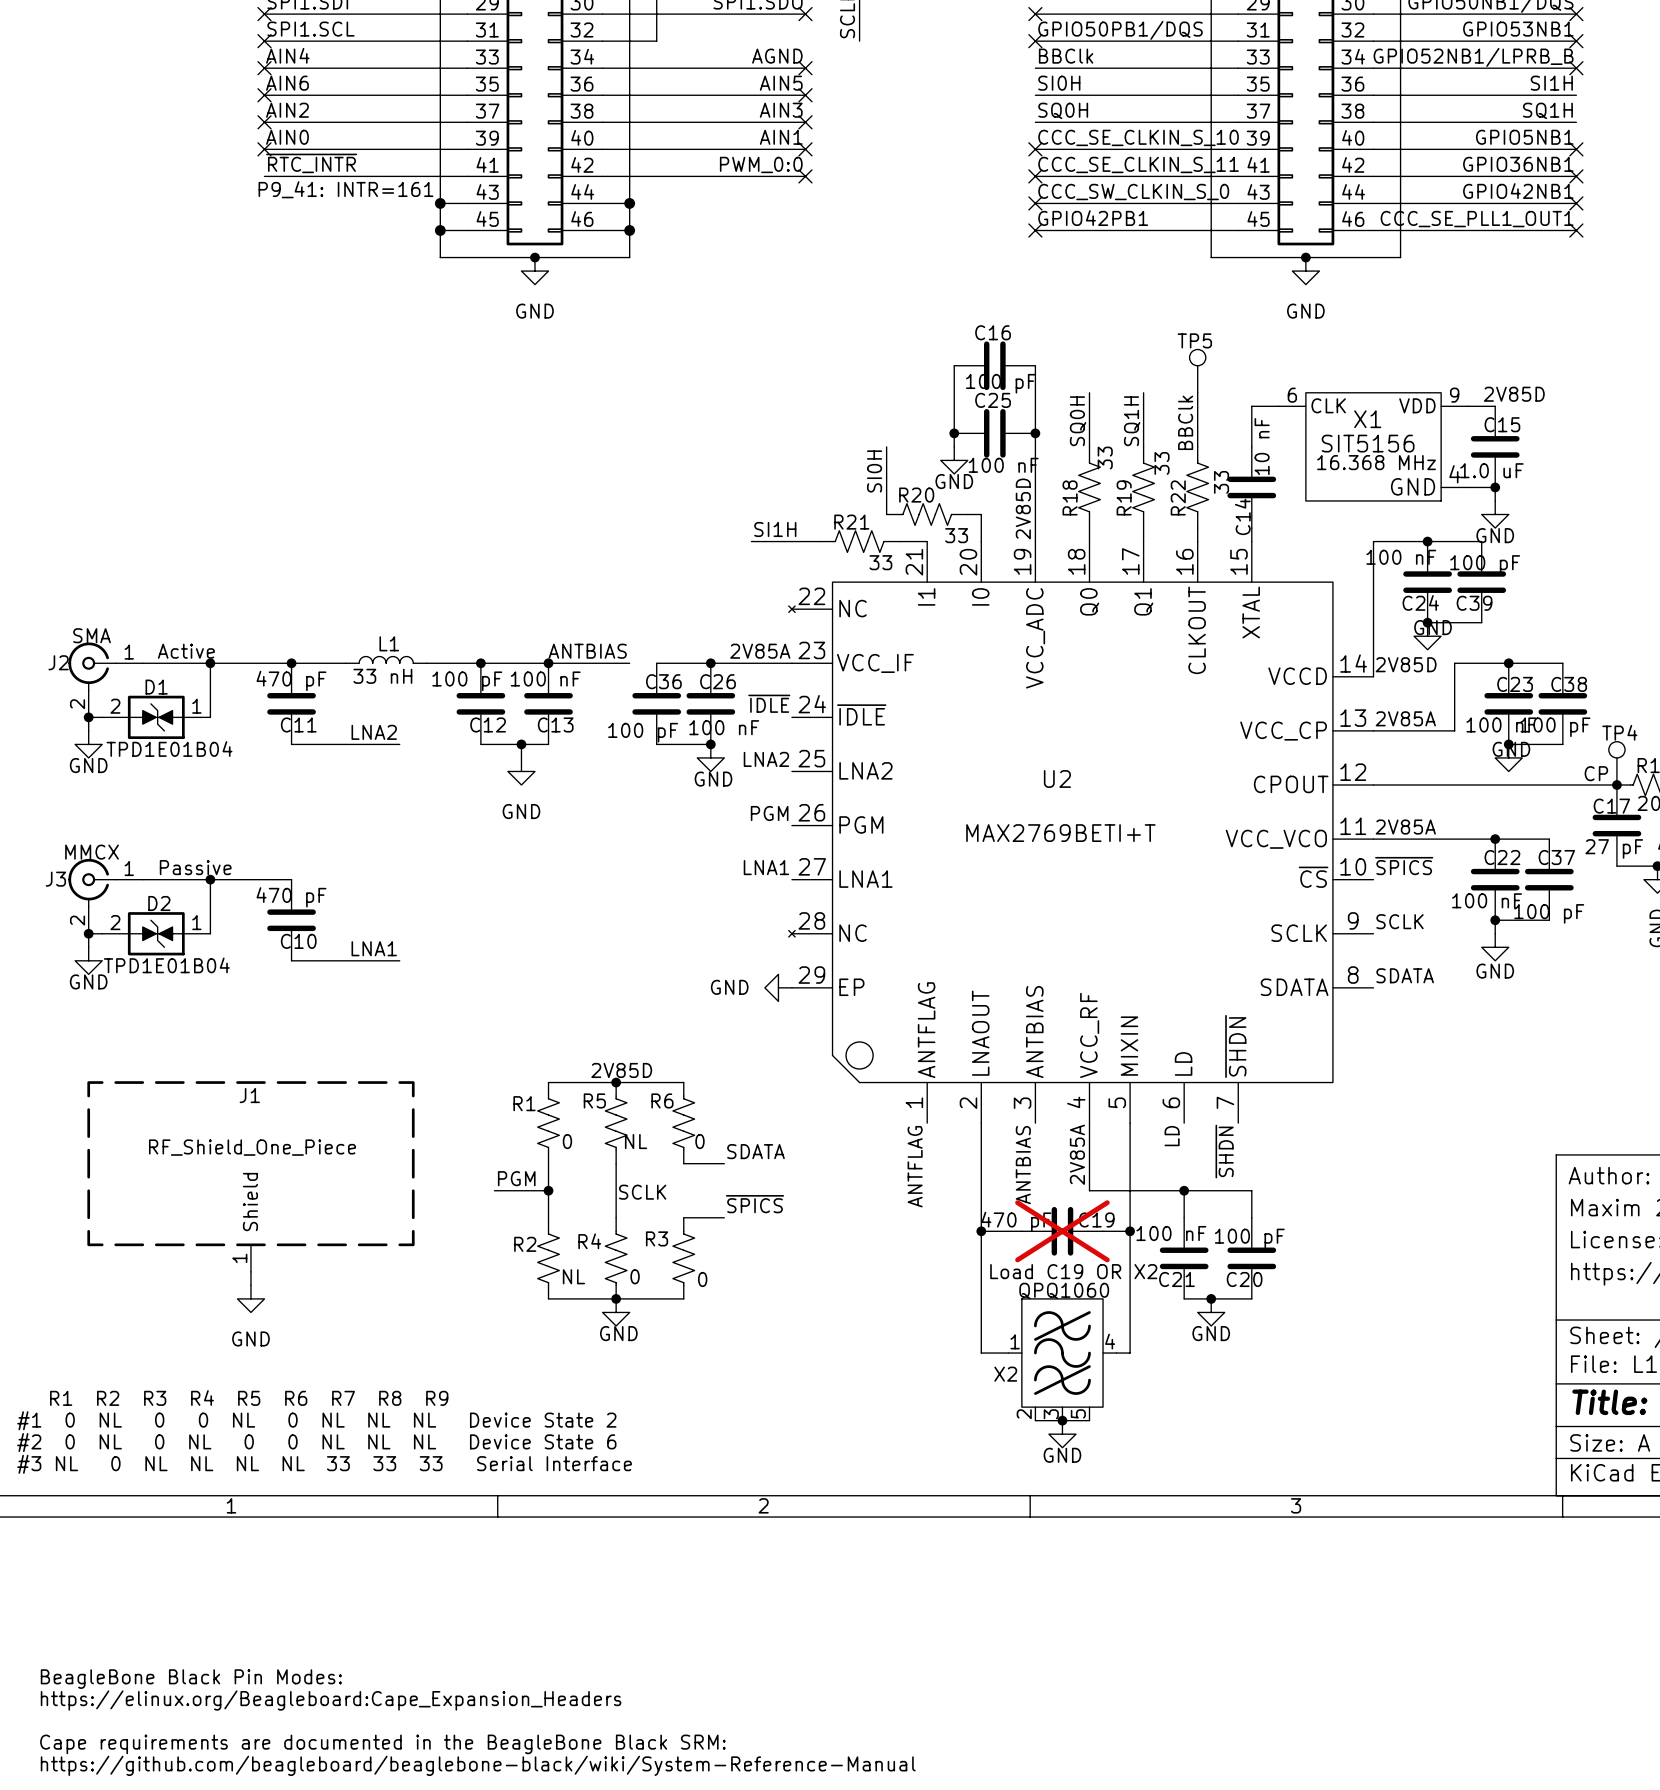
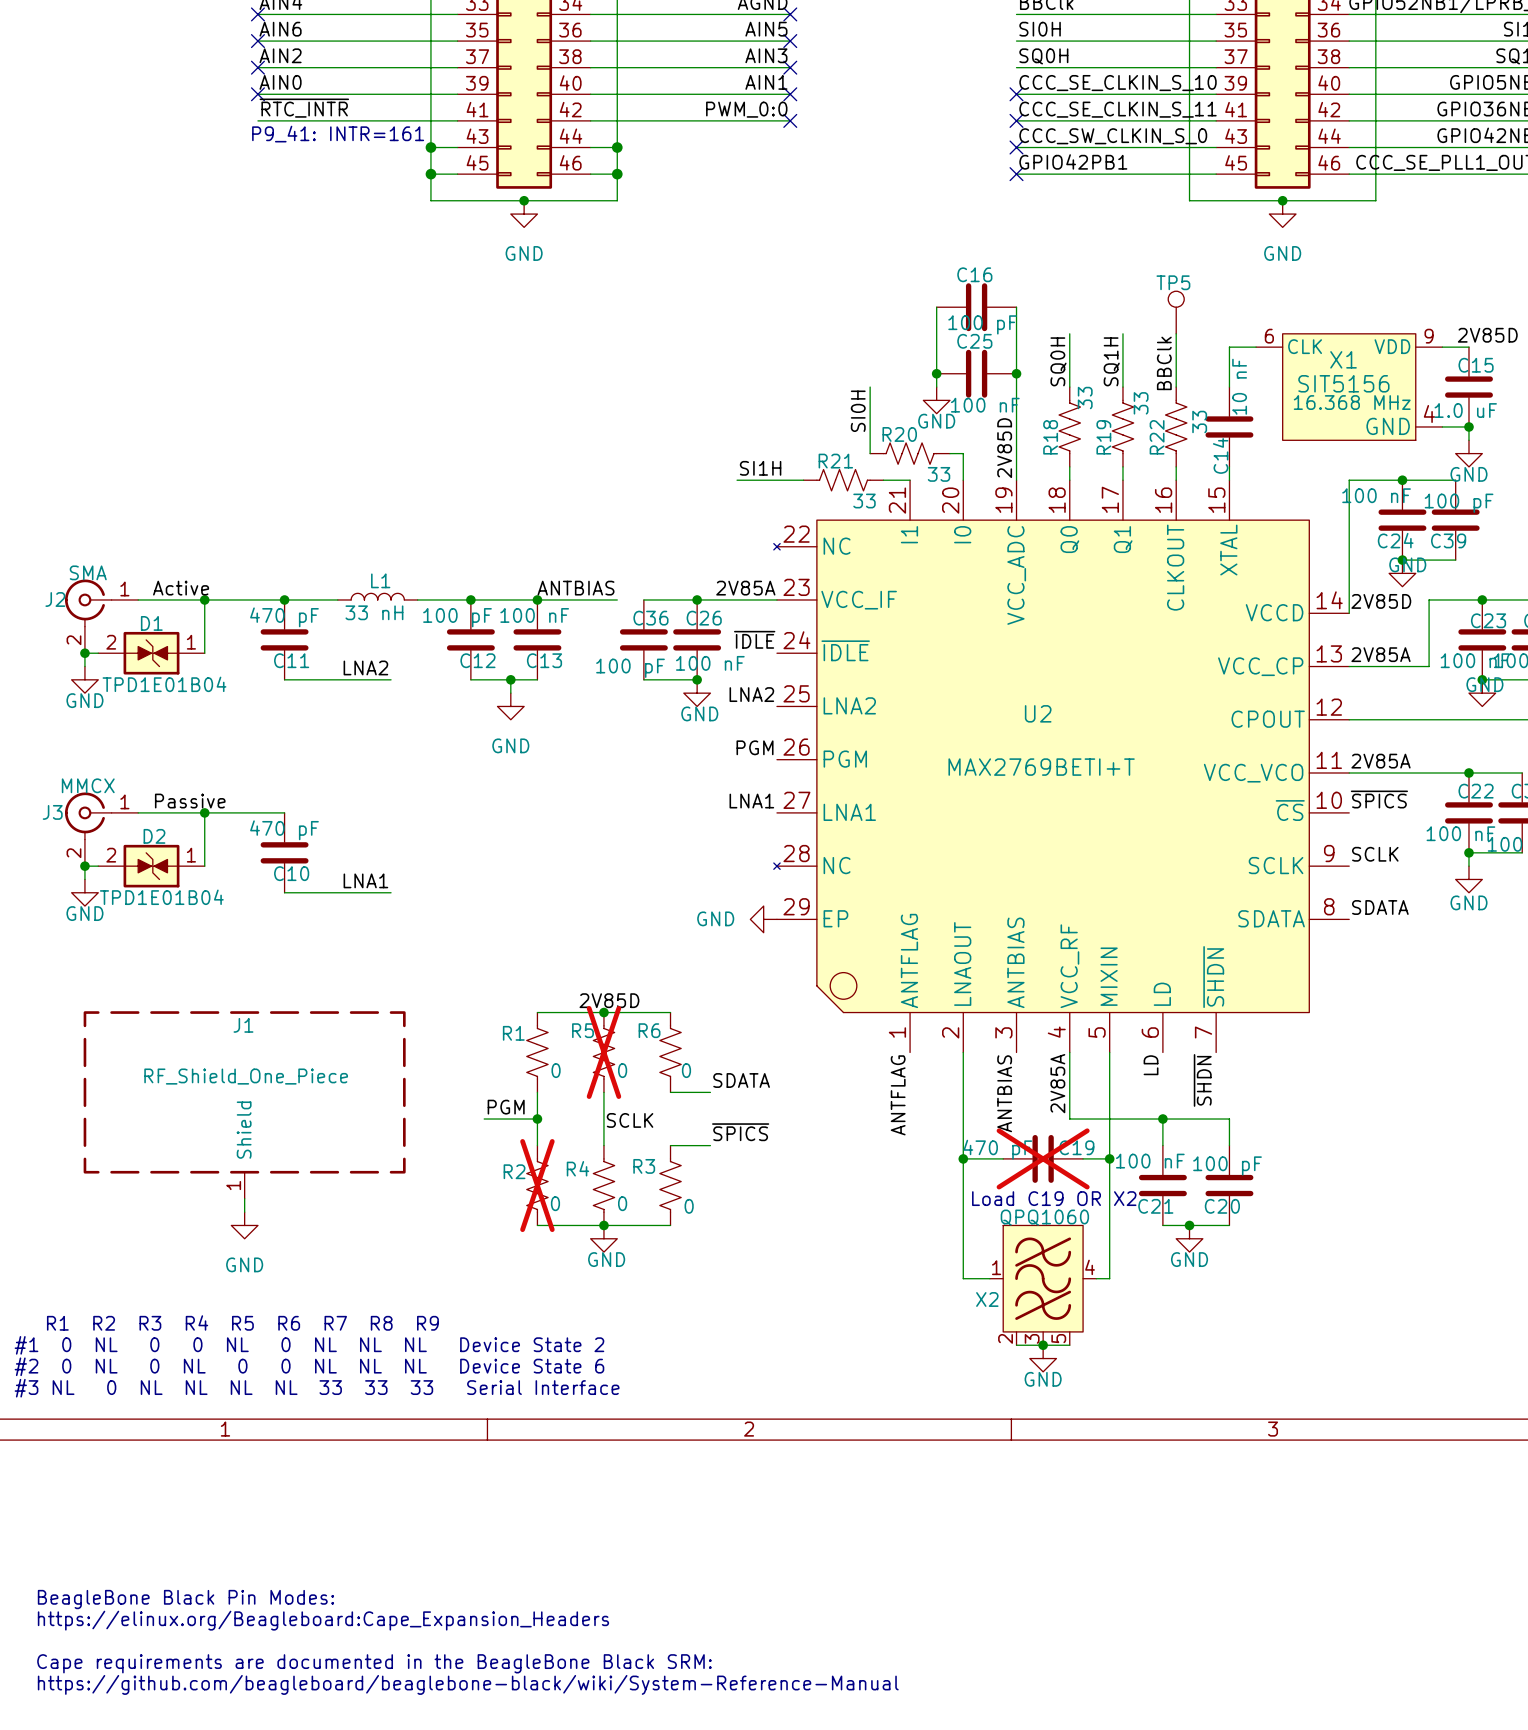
R5 do-not-place cross: none -> (603, 1052)
R5 value: NL (636, 1141) -> 0 (622, 1070)
R2 do-not-place cross: none -> (537, 1185)
R2 value: NL (573, 1276) -> 0 (555, 1203)

